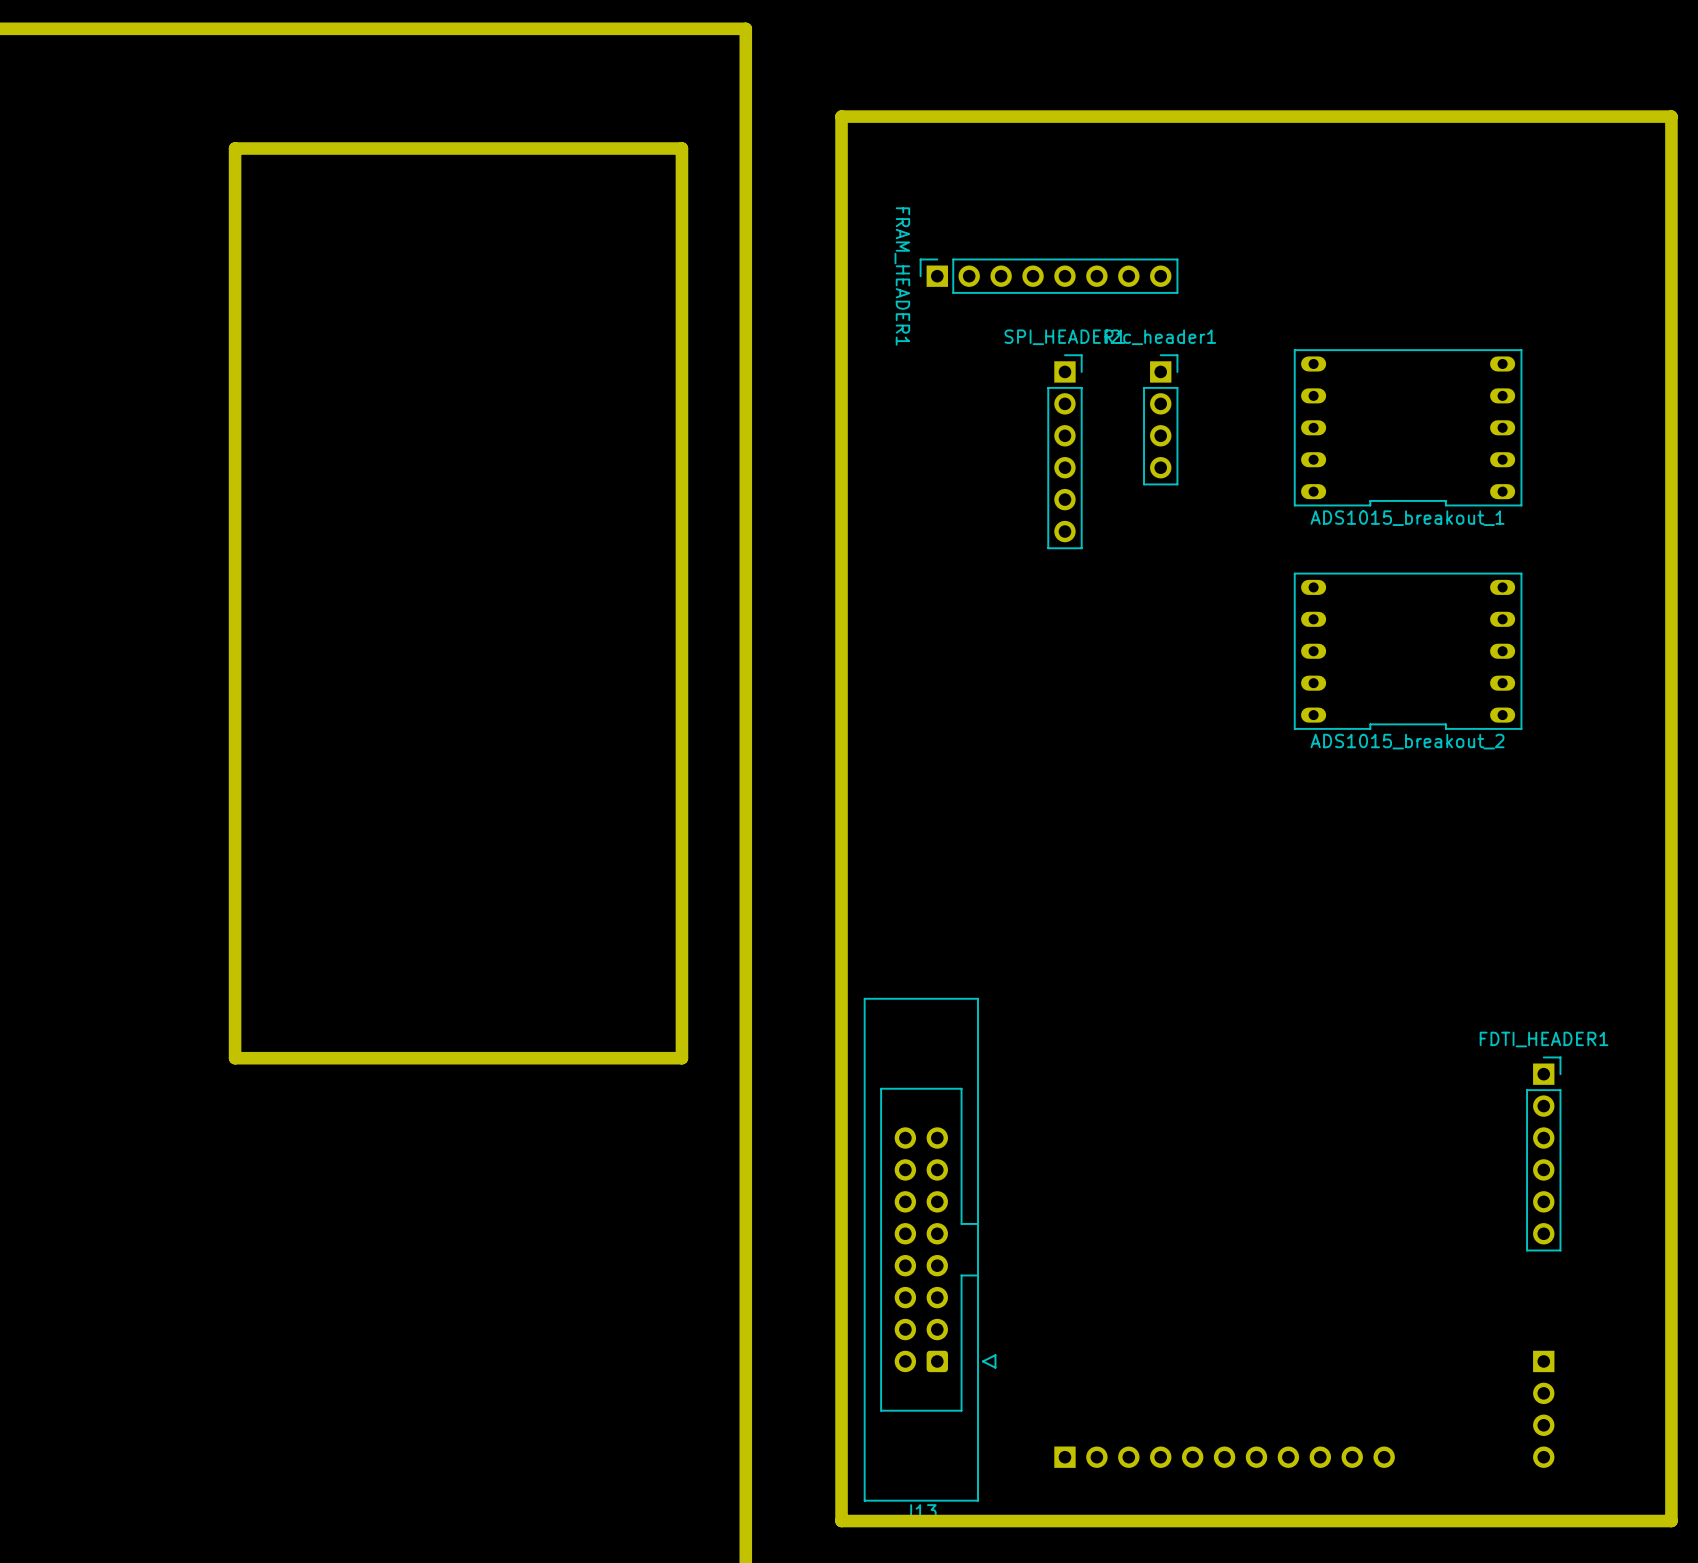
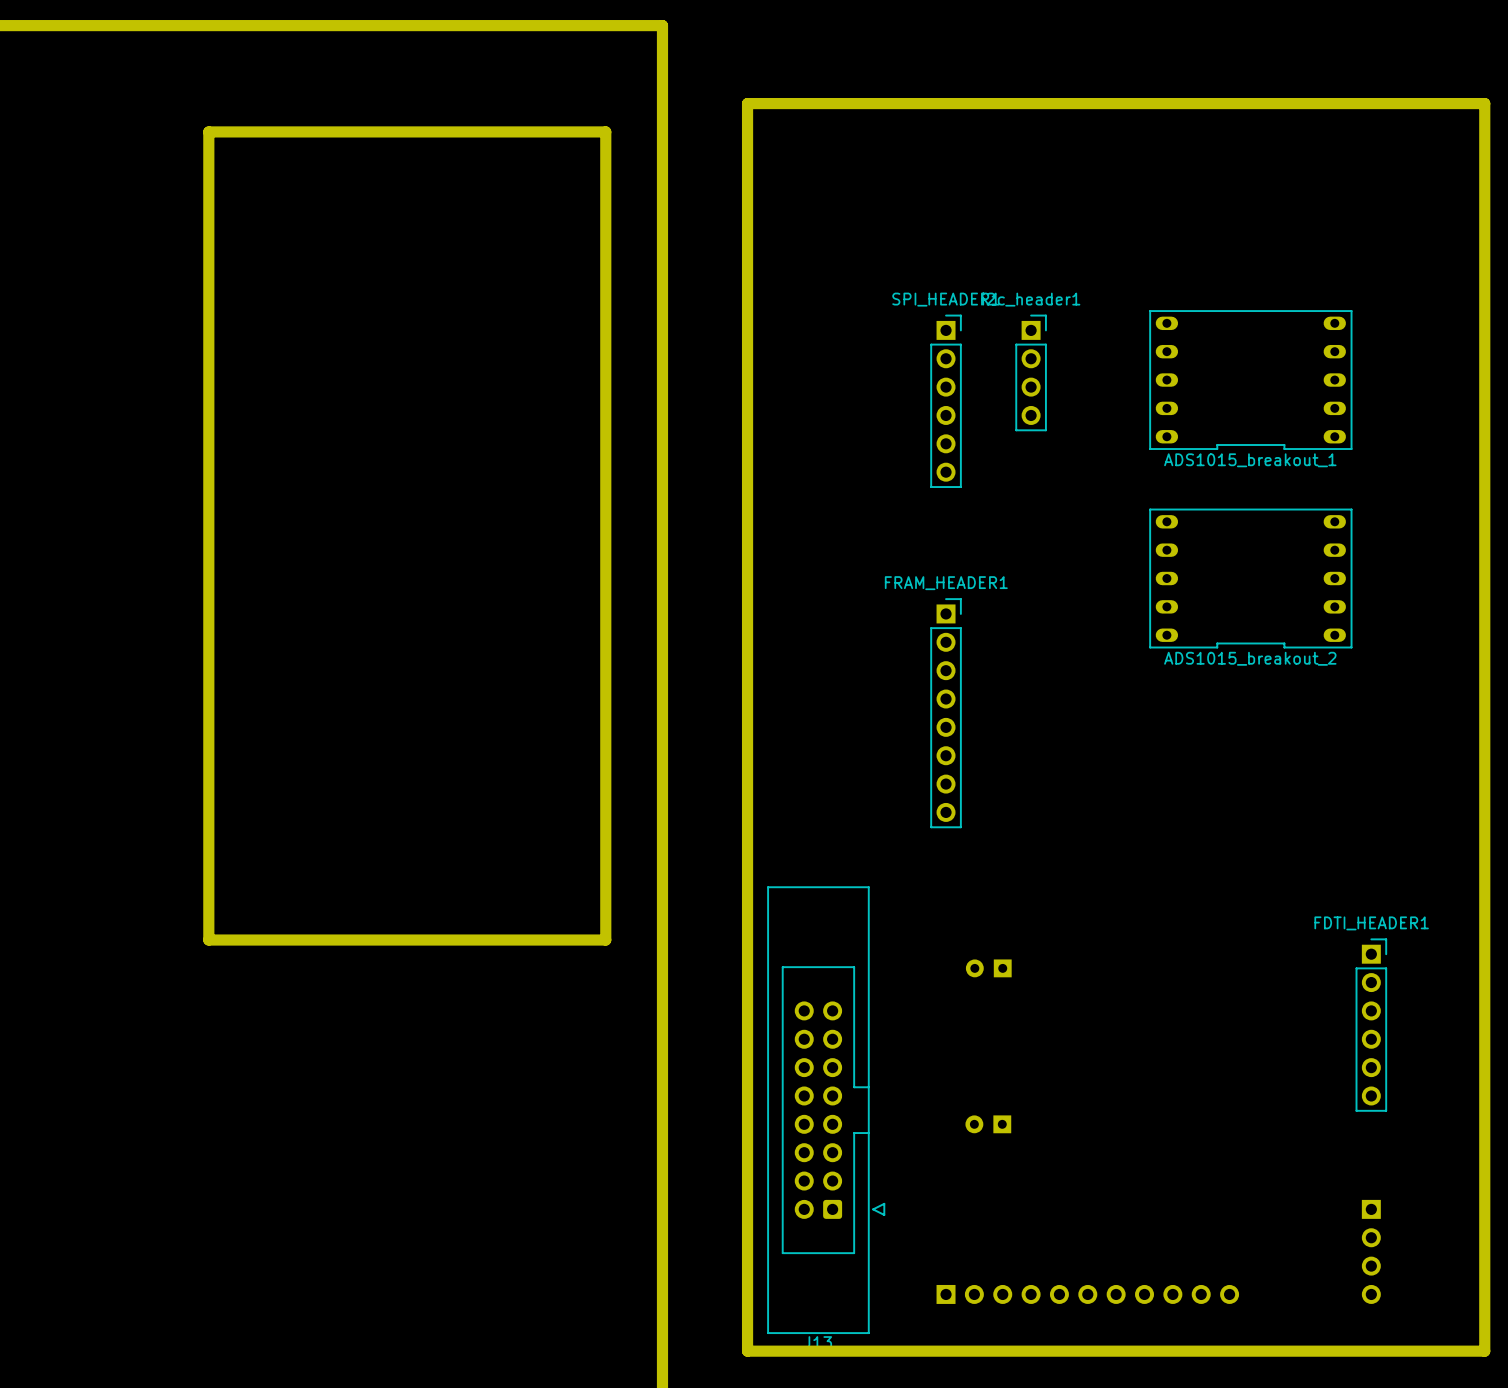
FRAM_HEADER1 rotation: 0° (1049, 276) -> 90° clockwise (946, 713)
FRAM_HEADER1 position: (1049, 276) -> (946, 713)
part: none -> (988, 968)
part: none -> (988, 1124)

